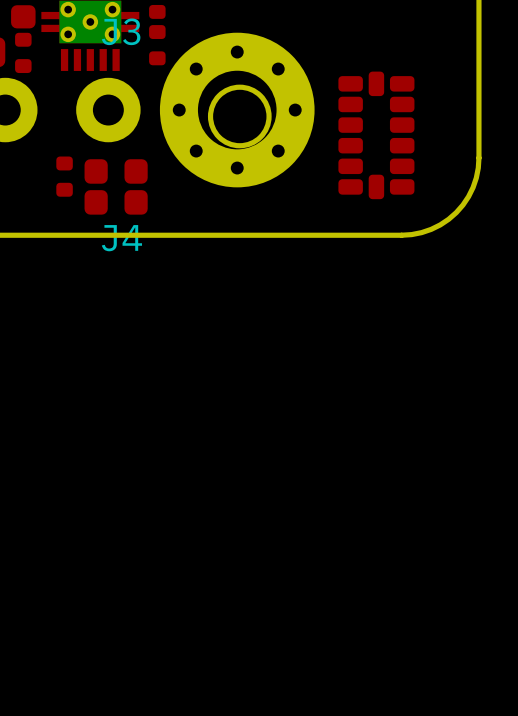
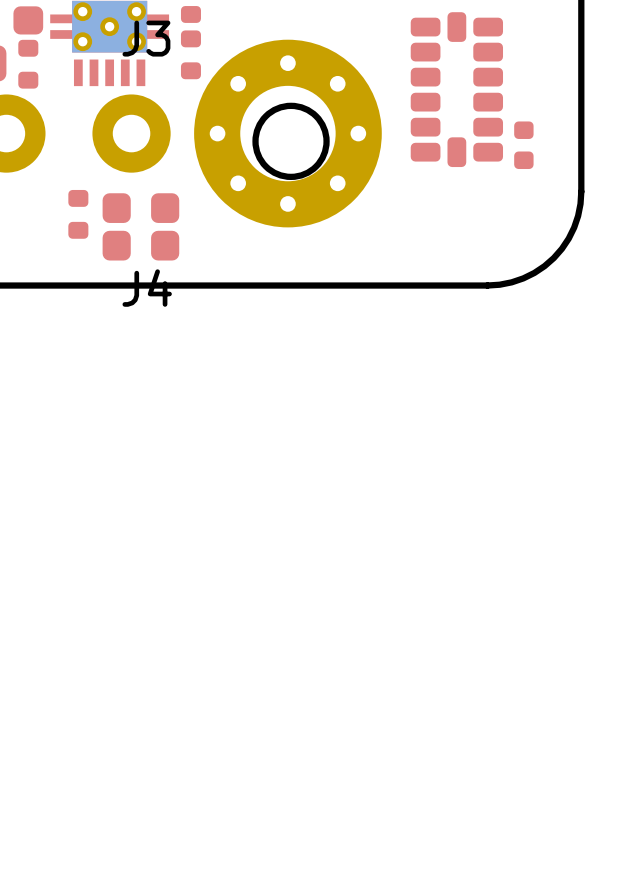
part: none -> (523, 145)
part position: (376, 135) -> (456, 89)

